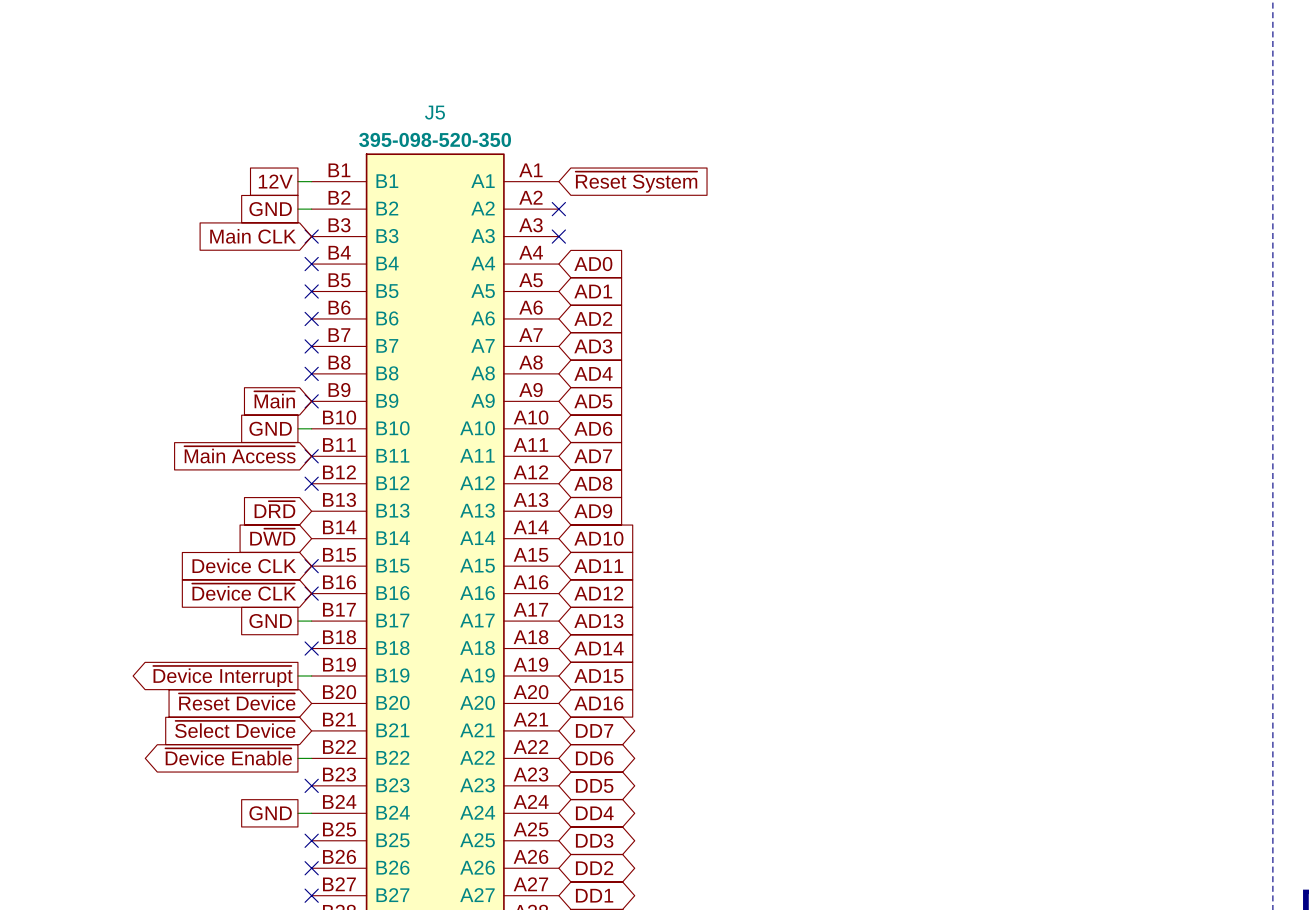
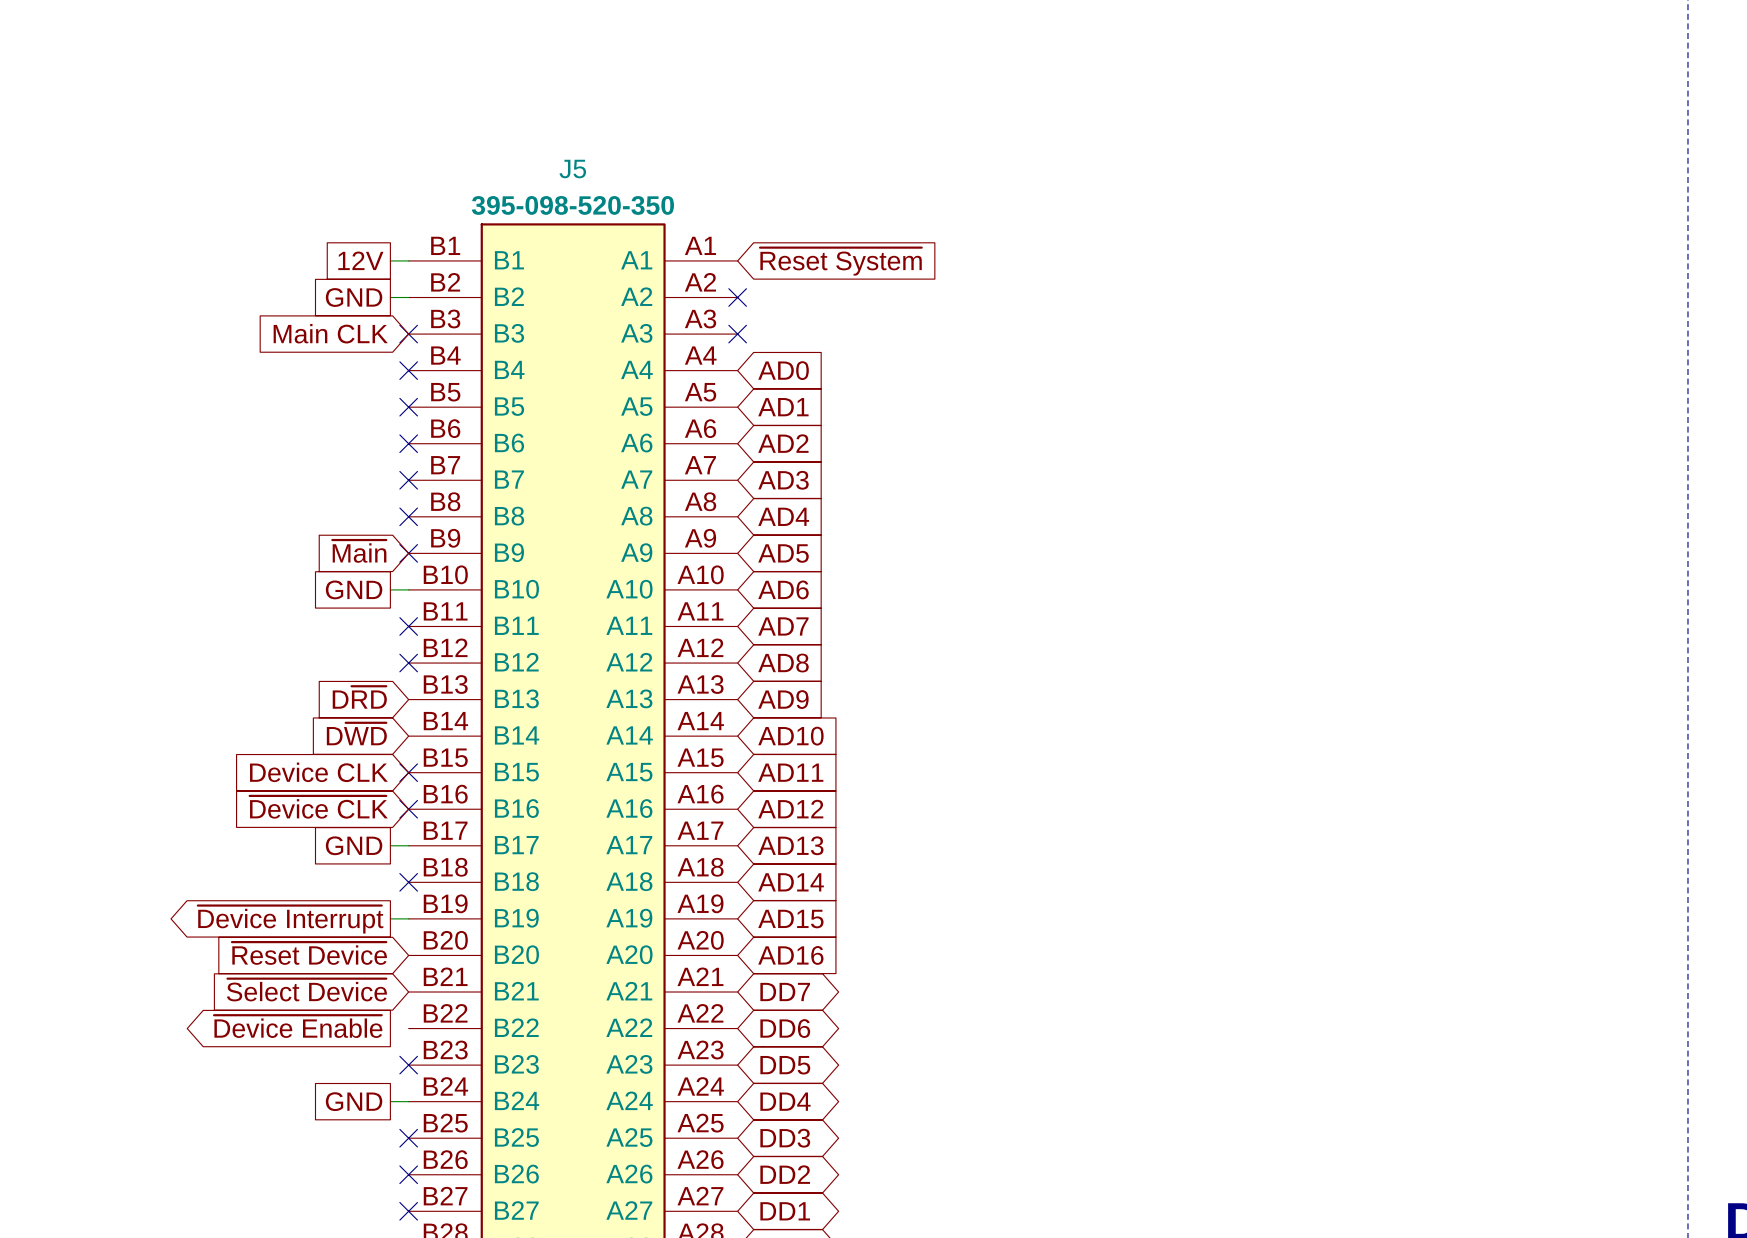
global label: ~{Main Access} (239, 454) -> none
wire: (297, 758) (311, 758) -> none

